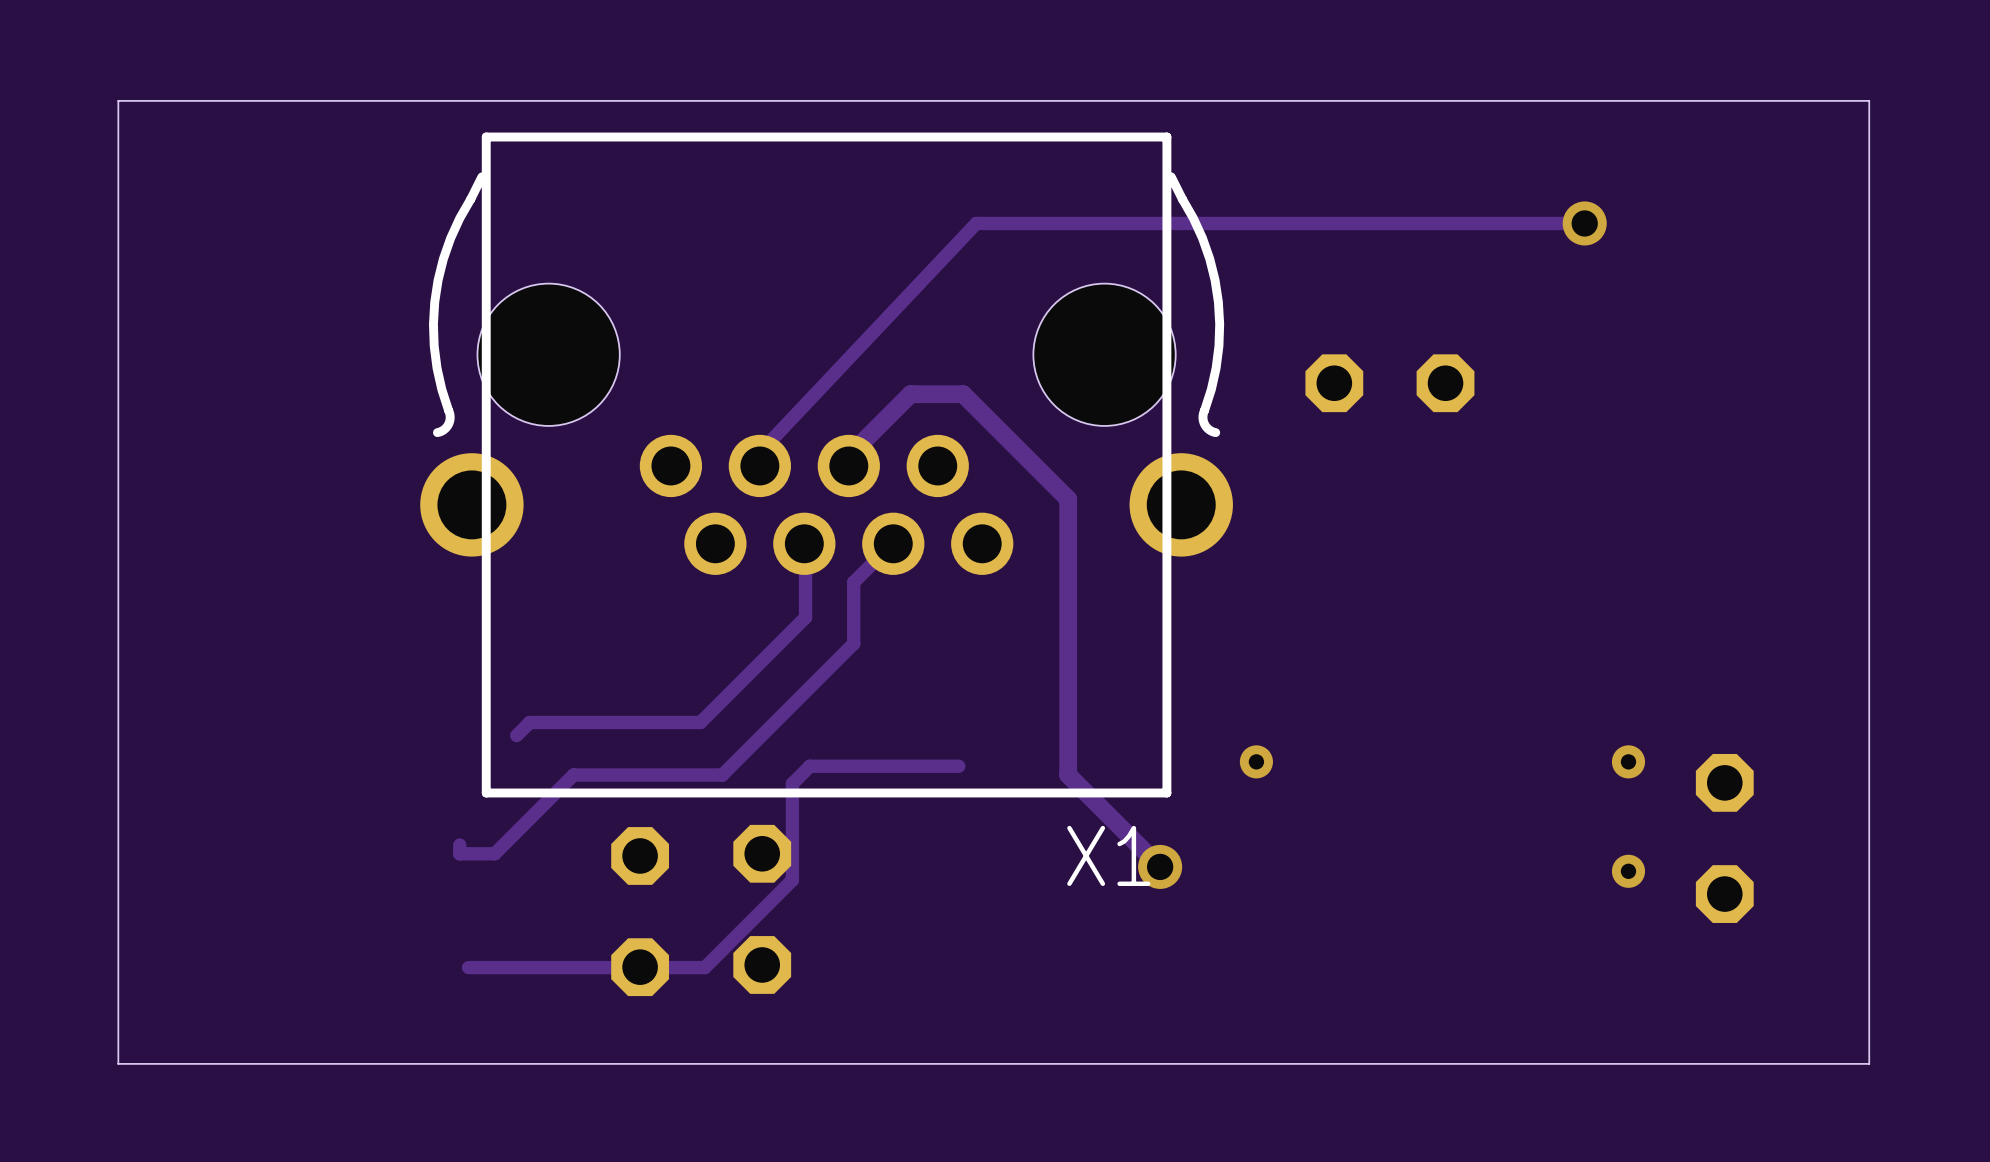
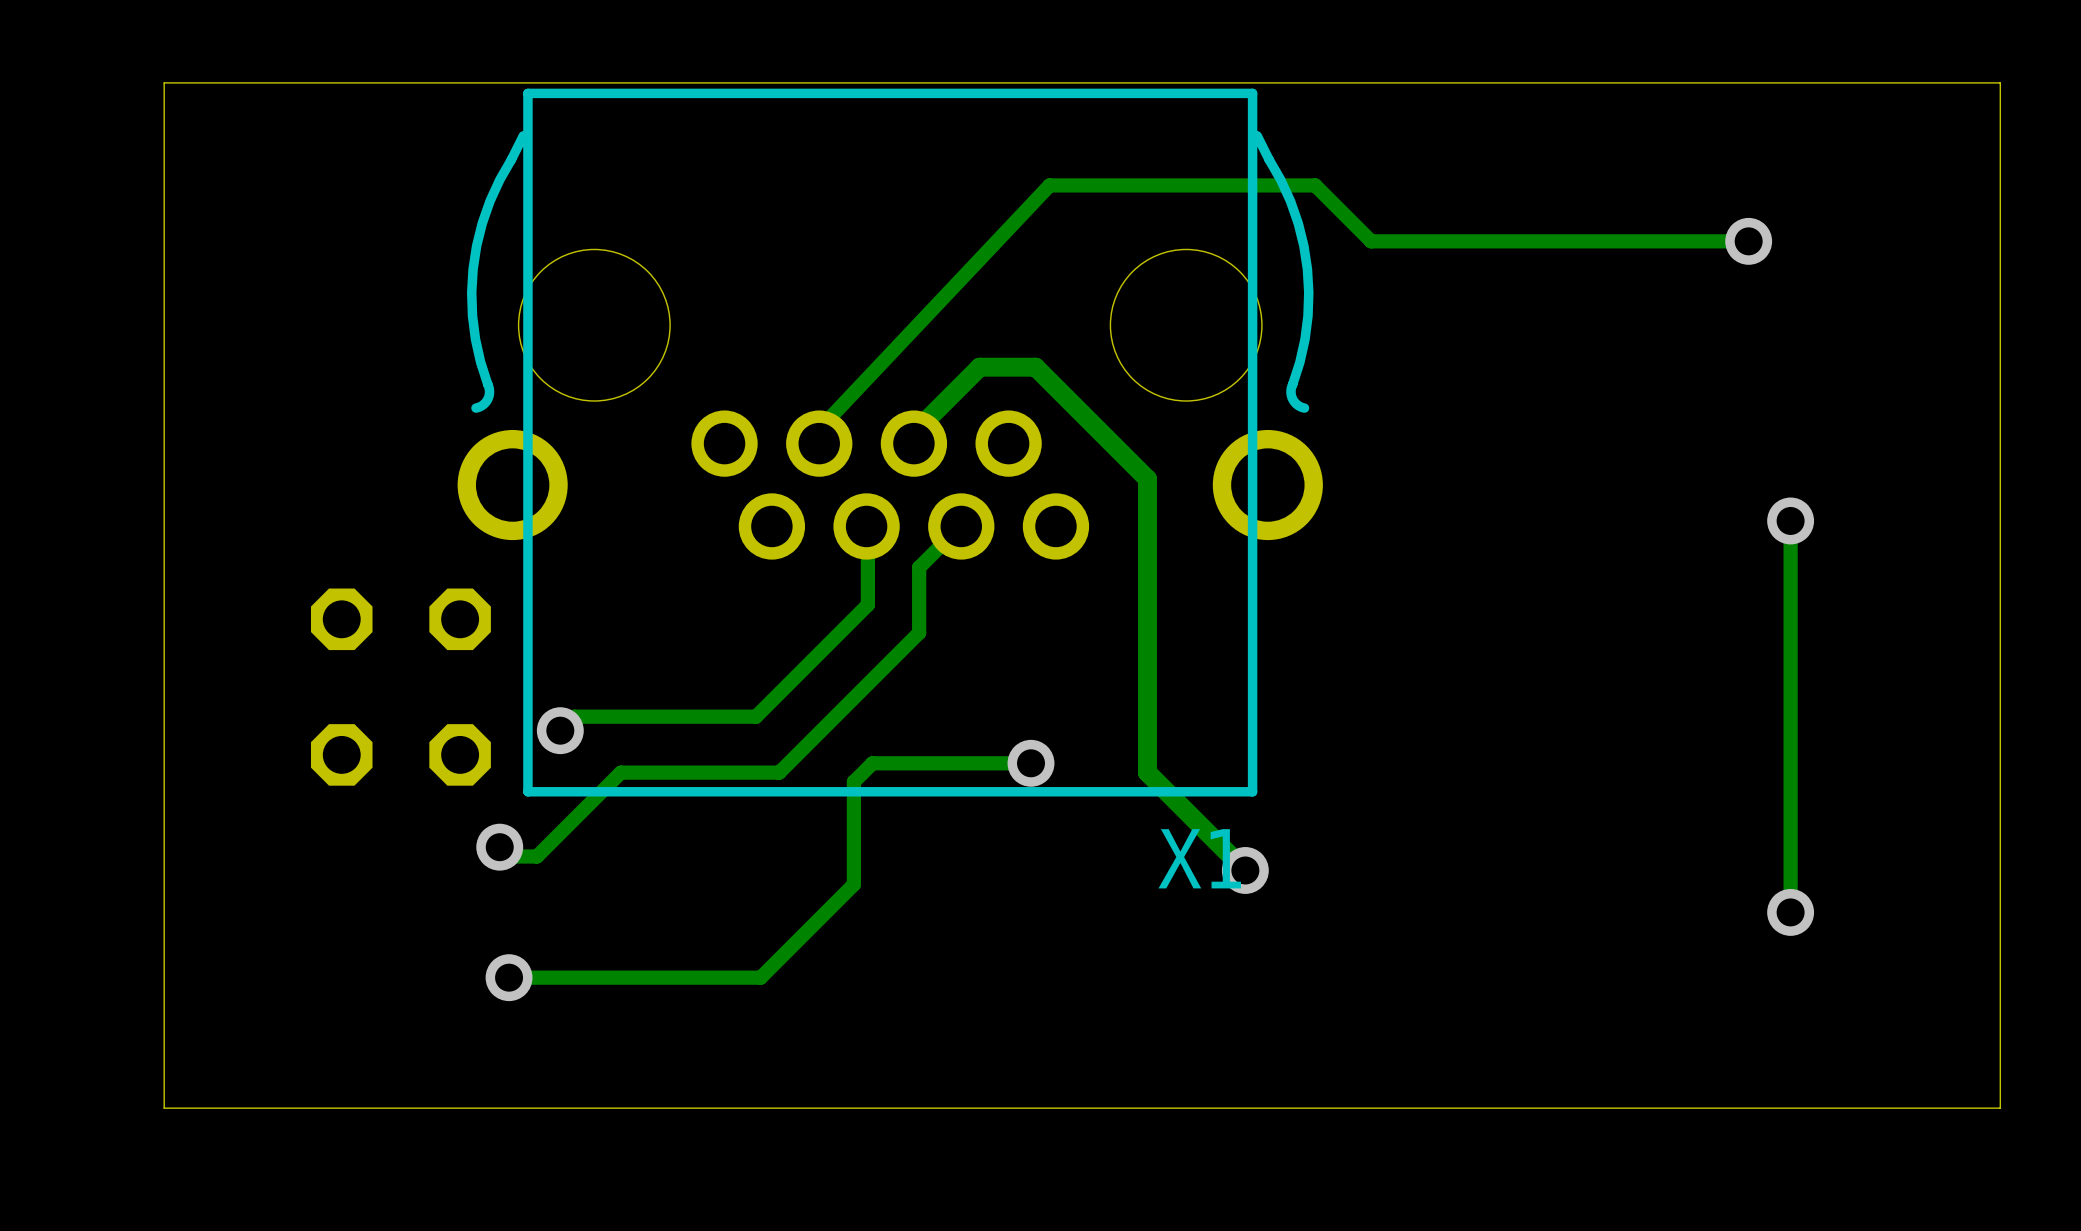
board edge: (1869, 127) (1869, 100) (118, 100) (118, 1063) (1869, 1063) -> (2000, 82) (164, 82) (164, 1108) (2000, 1108) (2000, 1080)
track: (1584, 223) (1225, 223) -> (1748, 241) (1371, 241) (1315, 185)
via position: (1584, 223) -> (1748, 241)
part: (1389, 383) -> none
track: none -> (1790, 520) (1790, 912)
via: none -> (1790, 520)
part: none -> (400, 619)
via: none -> (560, 730)
part: none -> (400, 754)
via: (1256, 761) -> none
via: (1628, 761) -> none
via: none -> (1031, 763)
part: (1724, 838) -> none
track: (459, 845) (459, 853) -> none
via: none -> (499, 847)
via: (1628, 871) -> none
via: none -> (1790, 912)
part: (762, 909) -> none
part: (640, 911) -> none
via: none -> (509, 977)

